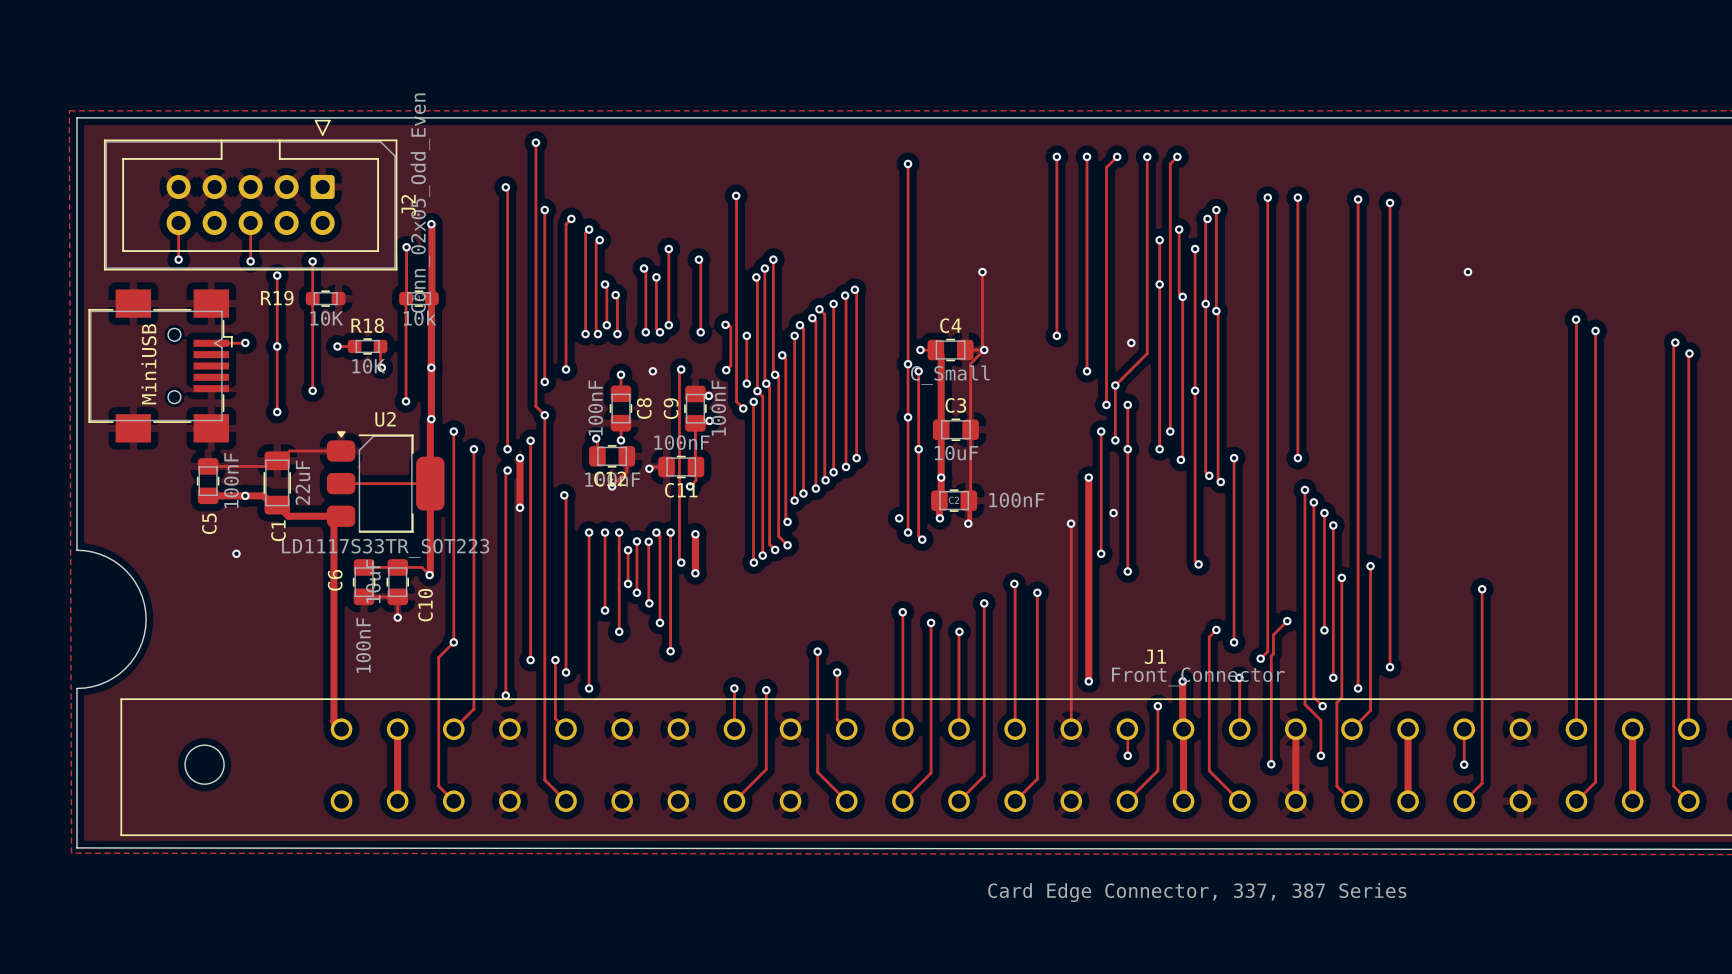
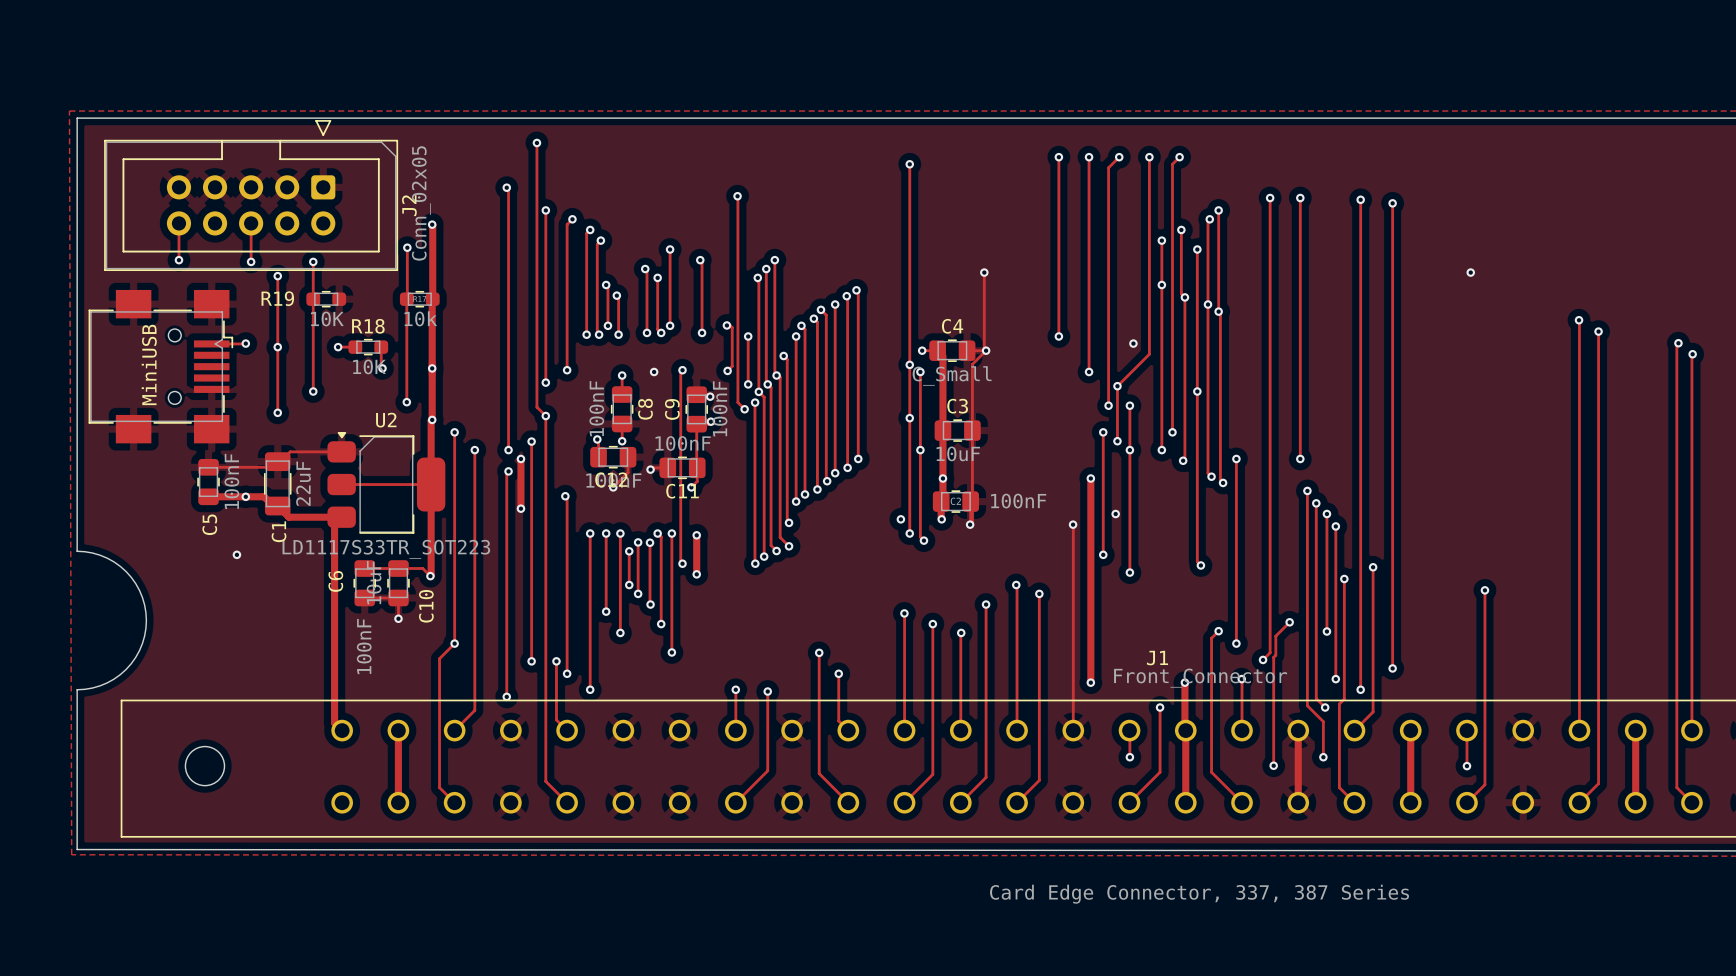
J2 value: Conn_02x05_Odd_Even (420, 203) -> Conn_02x05 (421, 203)

